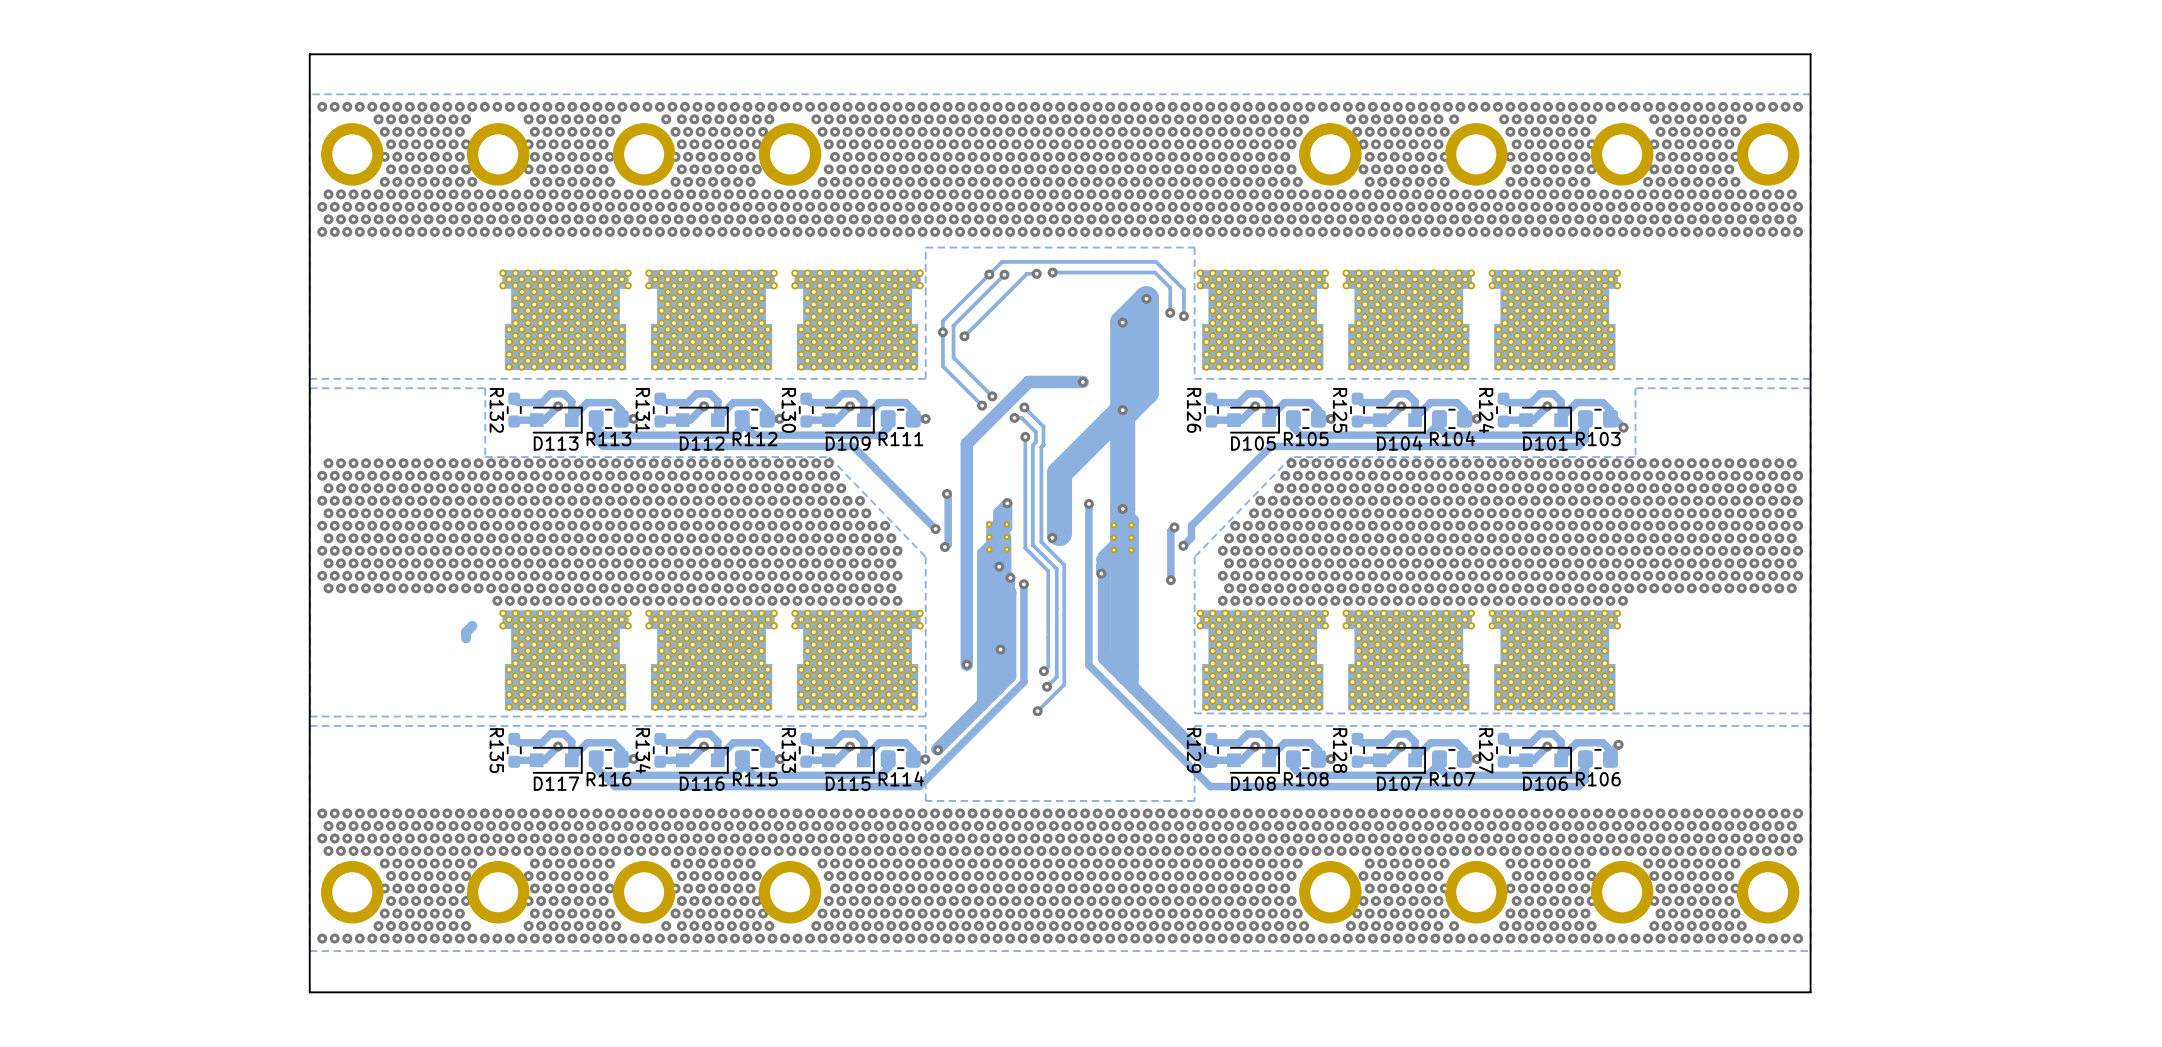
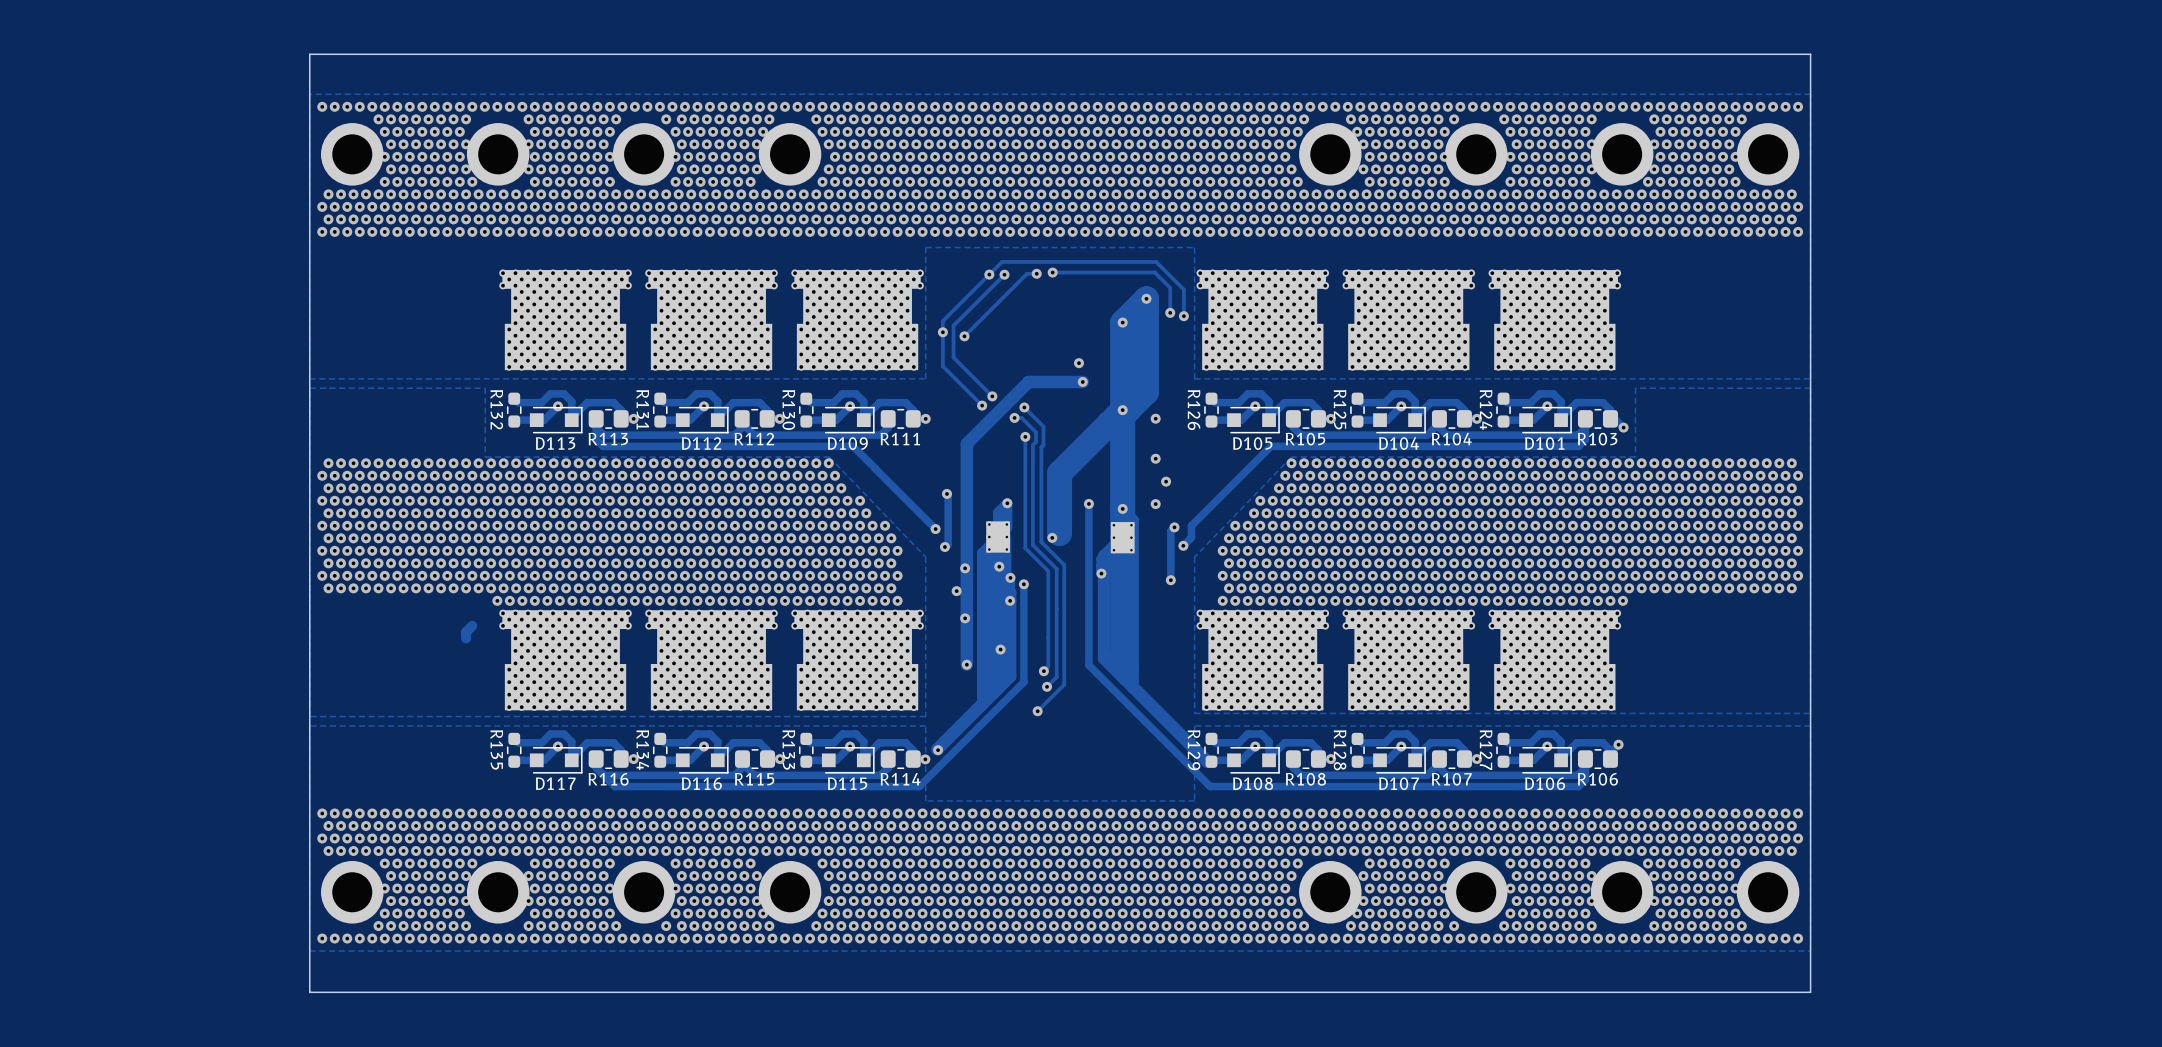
via: none -> (1078, 363)
via: none -> (1155, 418)
via: none -> (1155, 458)
via: none -> (1166, 481)
via: none -> (1155, 504)
via: none -> (965, 568)
via: none -> (956, 591)
via: none -> (1010, 600)
via: none -> (965, 618)

